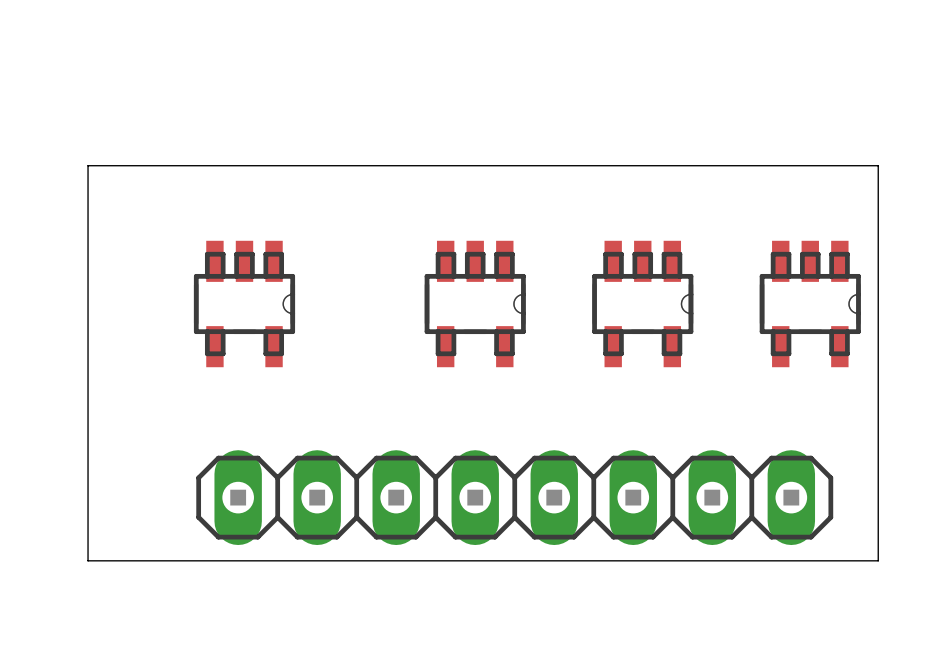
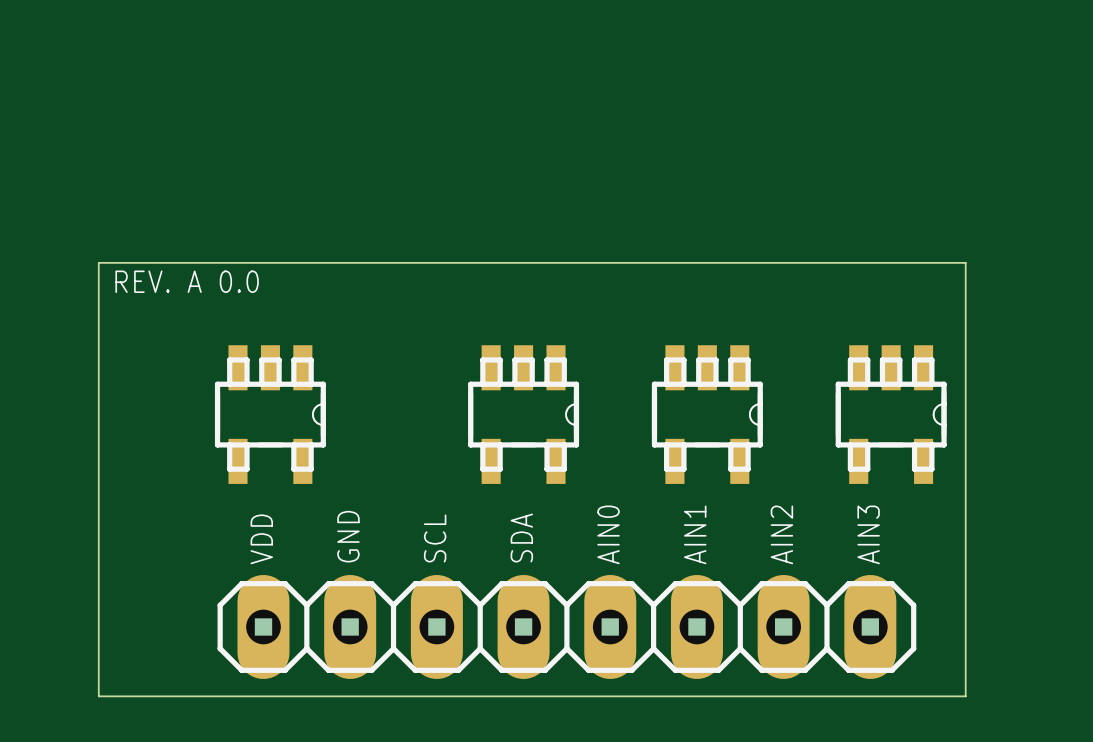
text: none -> REV. A 0.0 (187, 281)
text: none -> AIN0 (608, 534)
text: none -> AIN1 (695, 534)
text: none -> AIN2 (781, 534)
text: none -> AIN3 (868, 534)
text: none -> VDD (261, 539)
text: none -> GND (348, 536)
text: none -> SCL (435, 538)
text: none -> SDA (521, 538)

